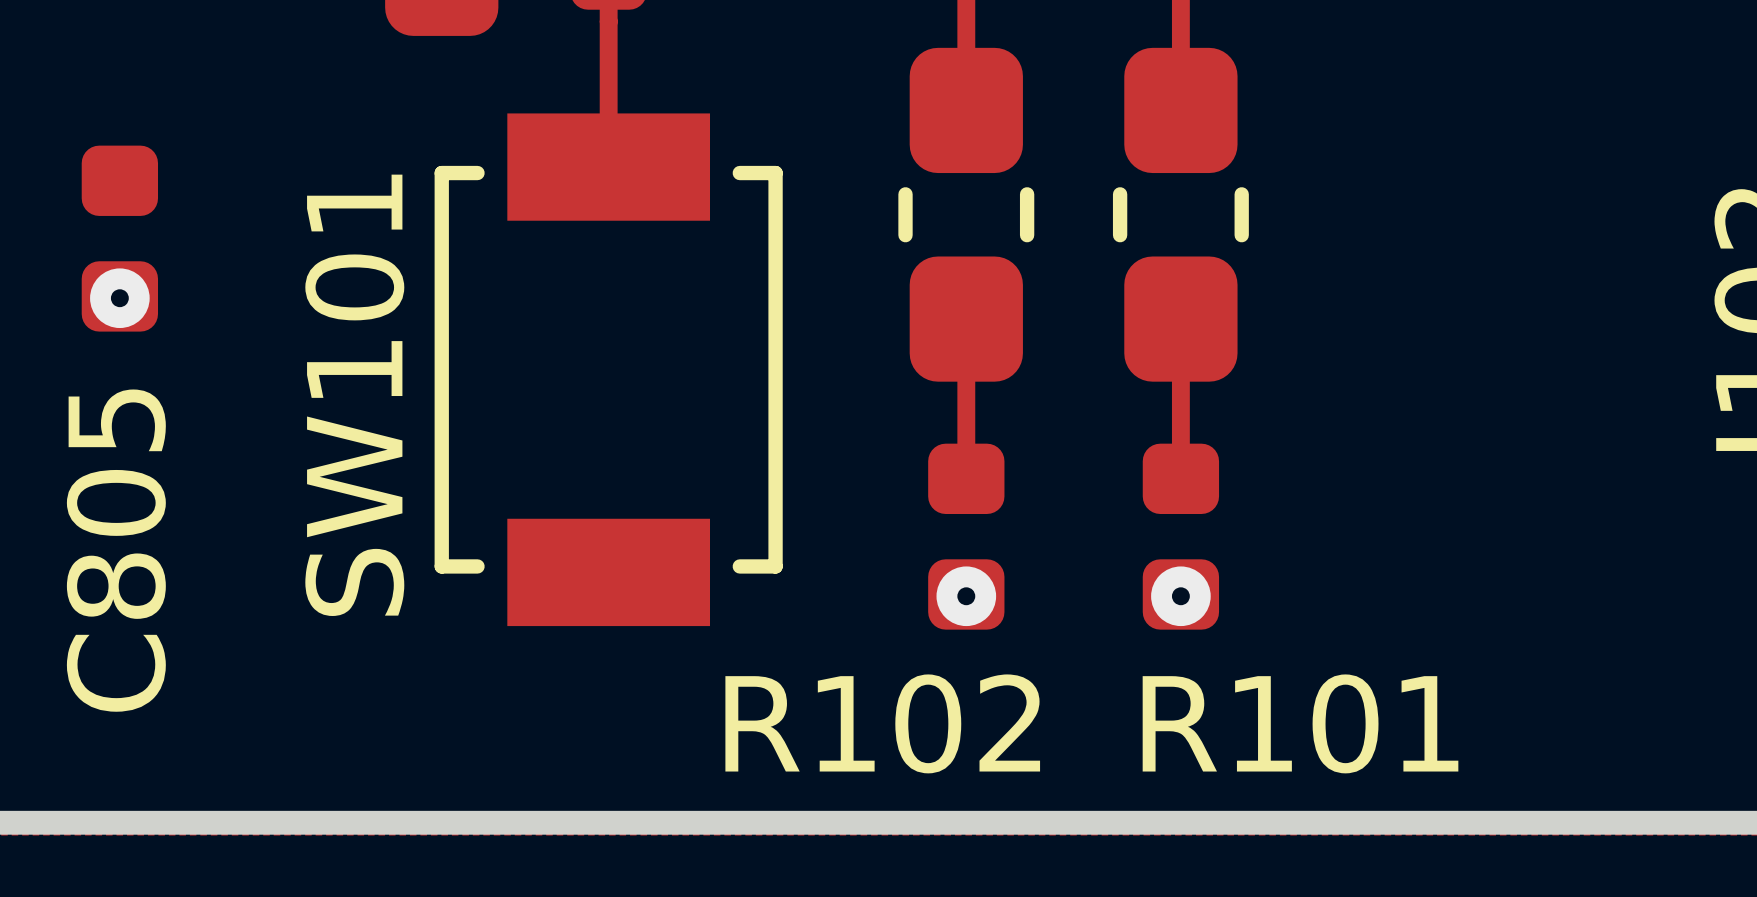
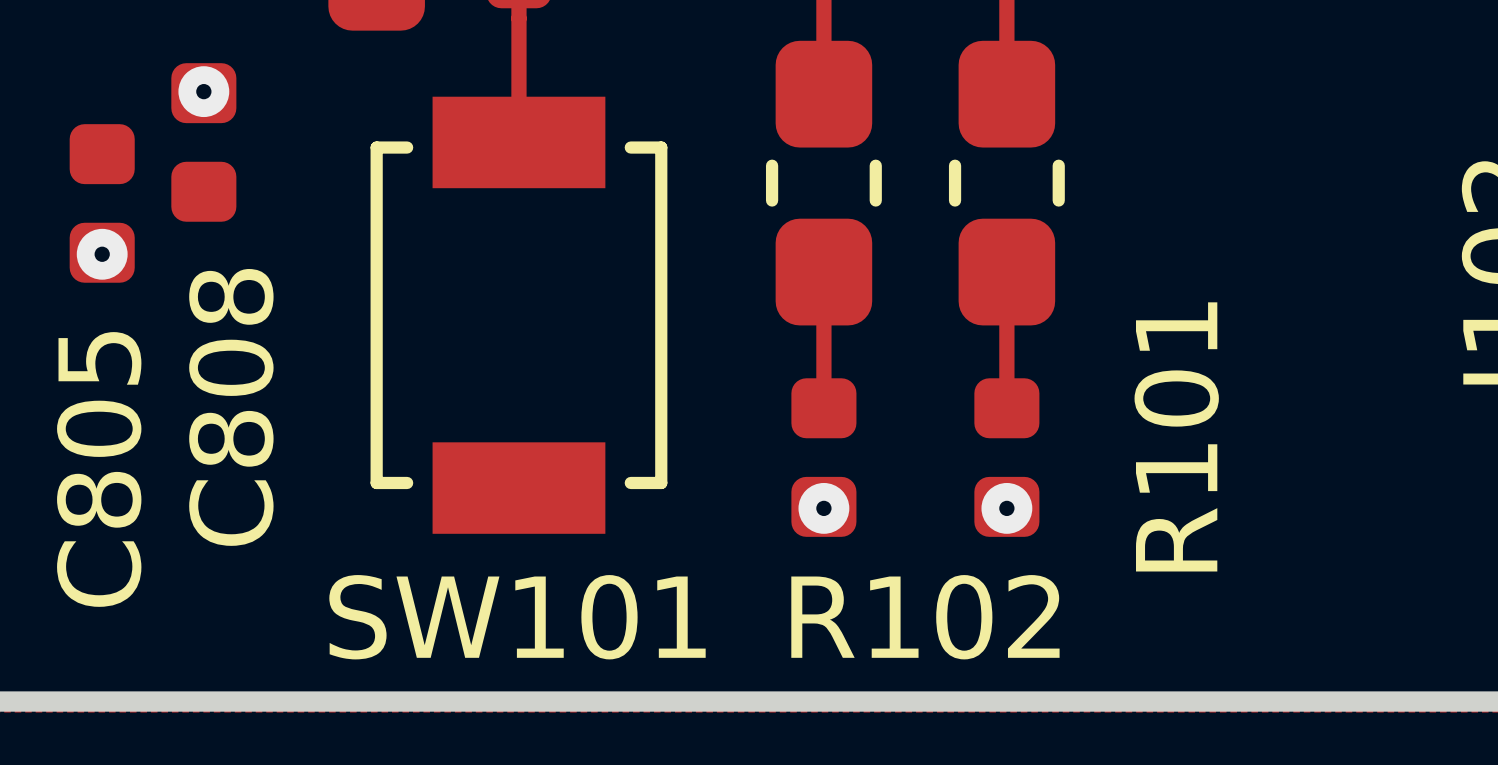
via: none -> (203, 91)
C808: none -> (203, 142)
SW101 name rotation: 0° (354, 395) -> 90° clockwise (517, 617)
R102 name position: R102 (882, 723) -> R102 (925, 617)
R101 name rotation: 0° (1300, 723) -> 90° counterclockwise (1176, 436)

